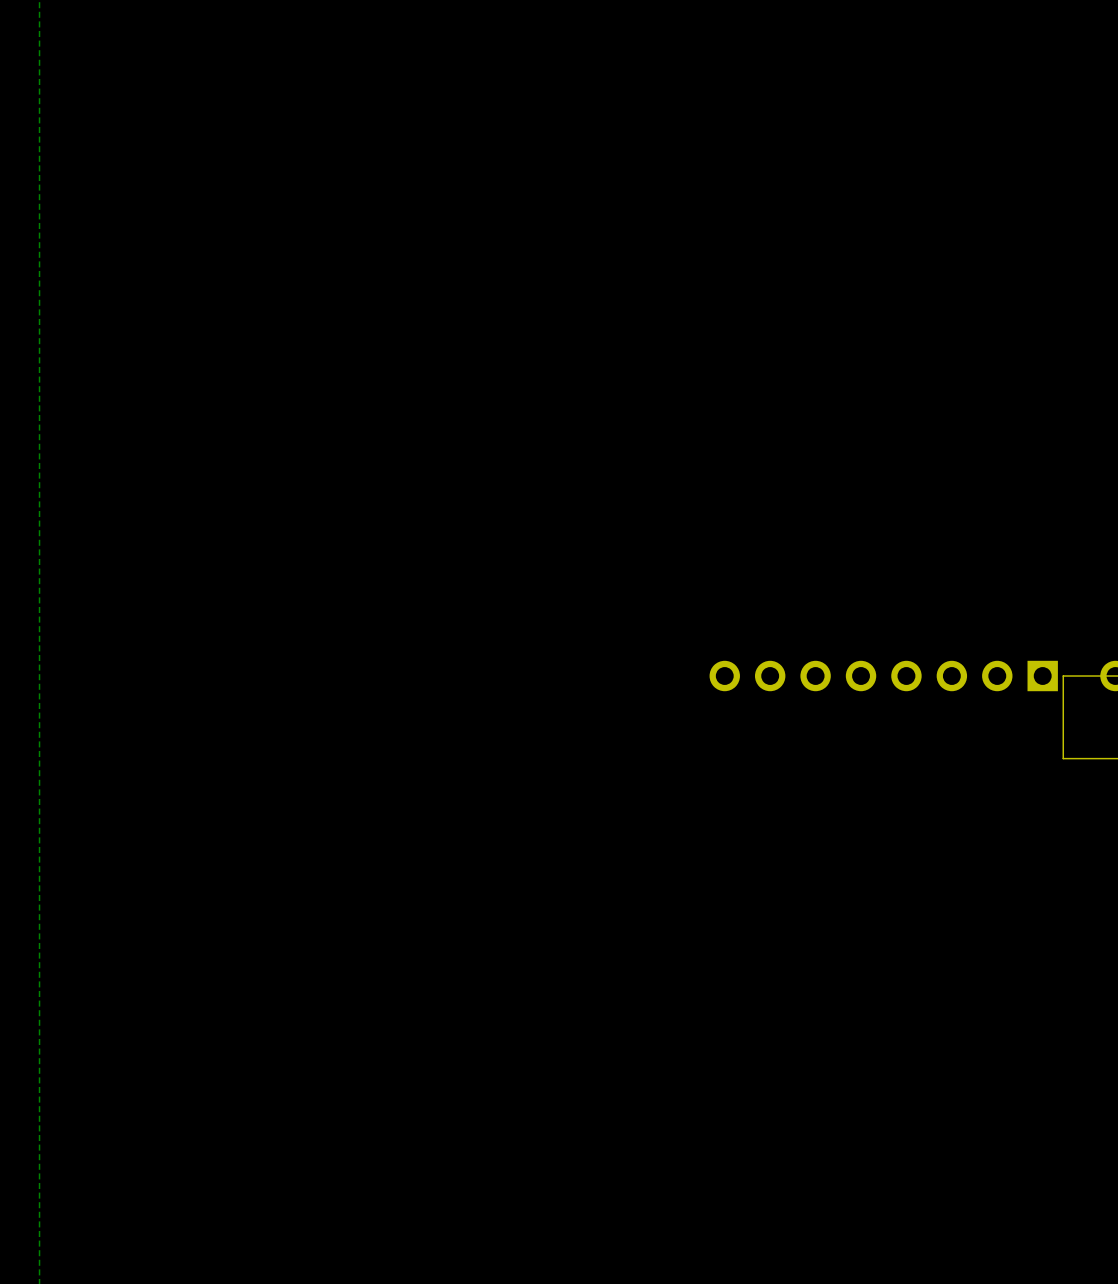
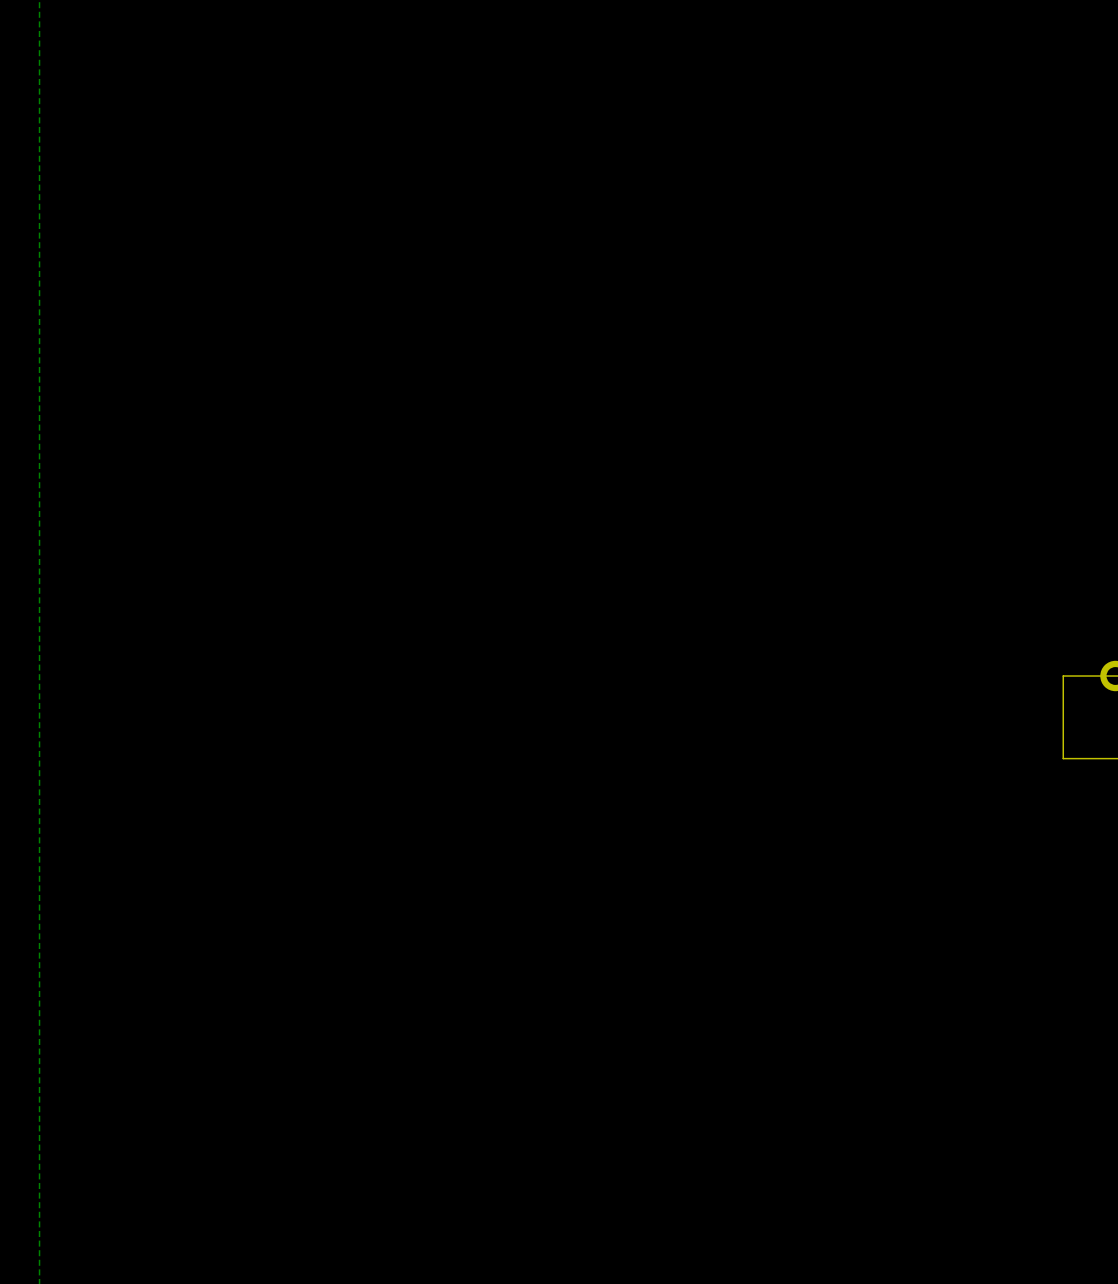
part: (883, 676) -> none

